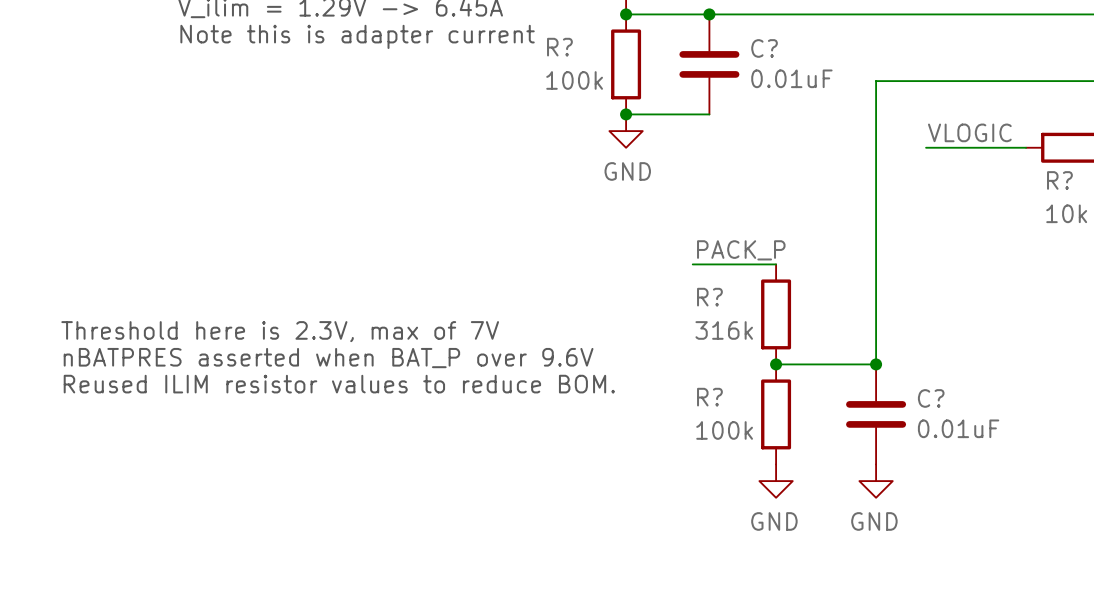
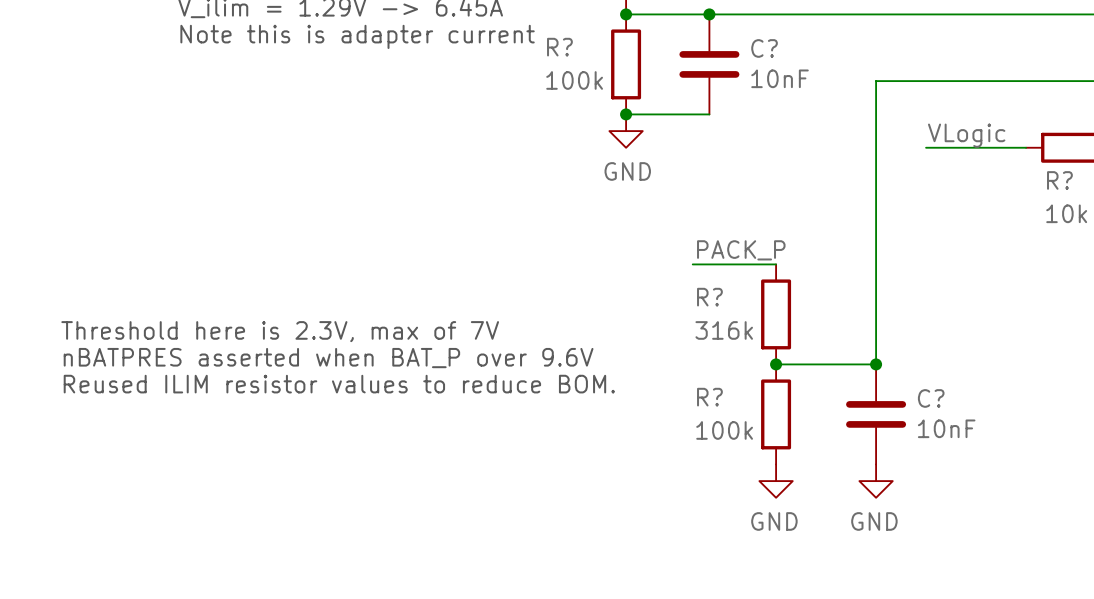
C? value: 0.01uF (791, 78) -> 10nF (780, 78)
label: VLOGIC (969, 132) -> VLogic (966, 135)
C? value: 0.01uF (958, 428) -> 10nF (946, 428)

